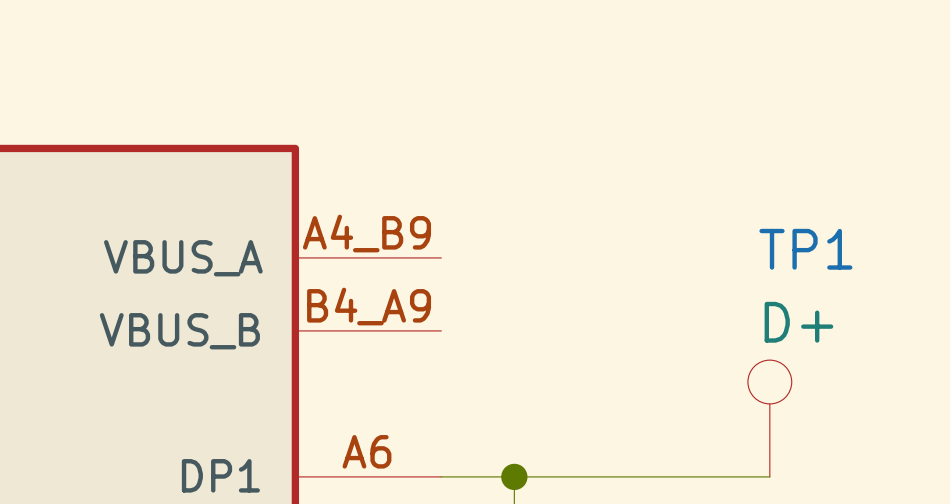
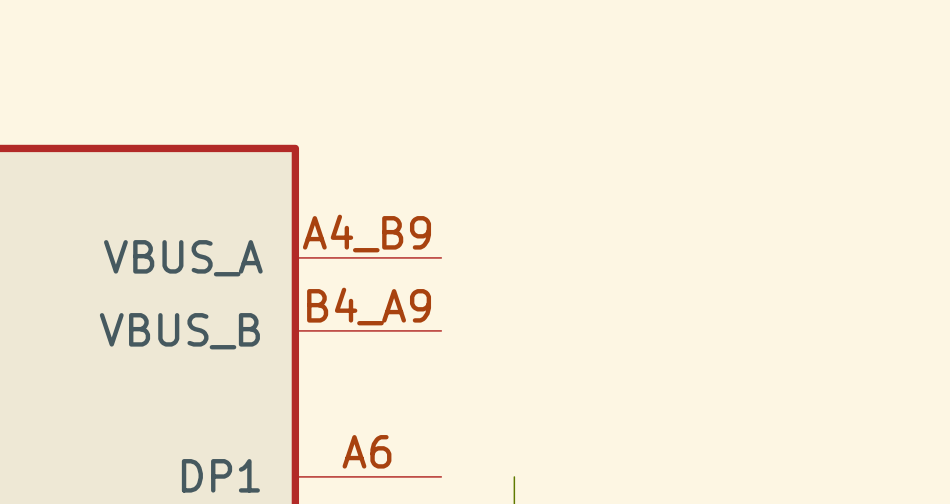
TP1: D+ (769, 418) -> none
wire: (441, 476) (769, 476) -> none
junction: (514, 476) -> none

